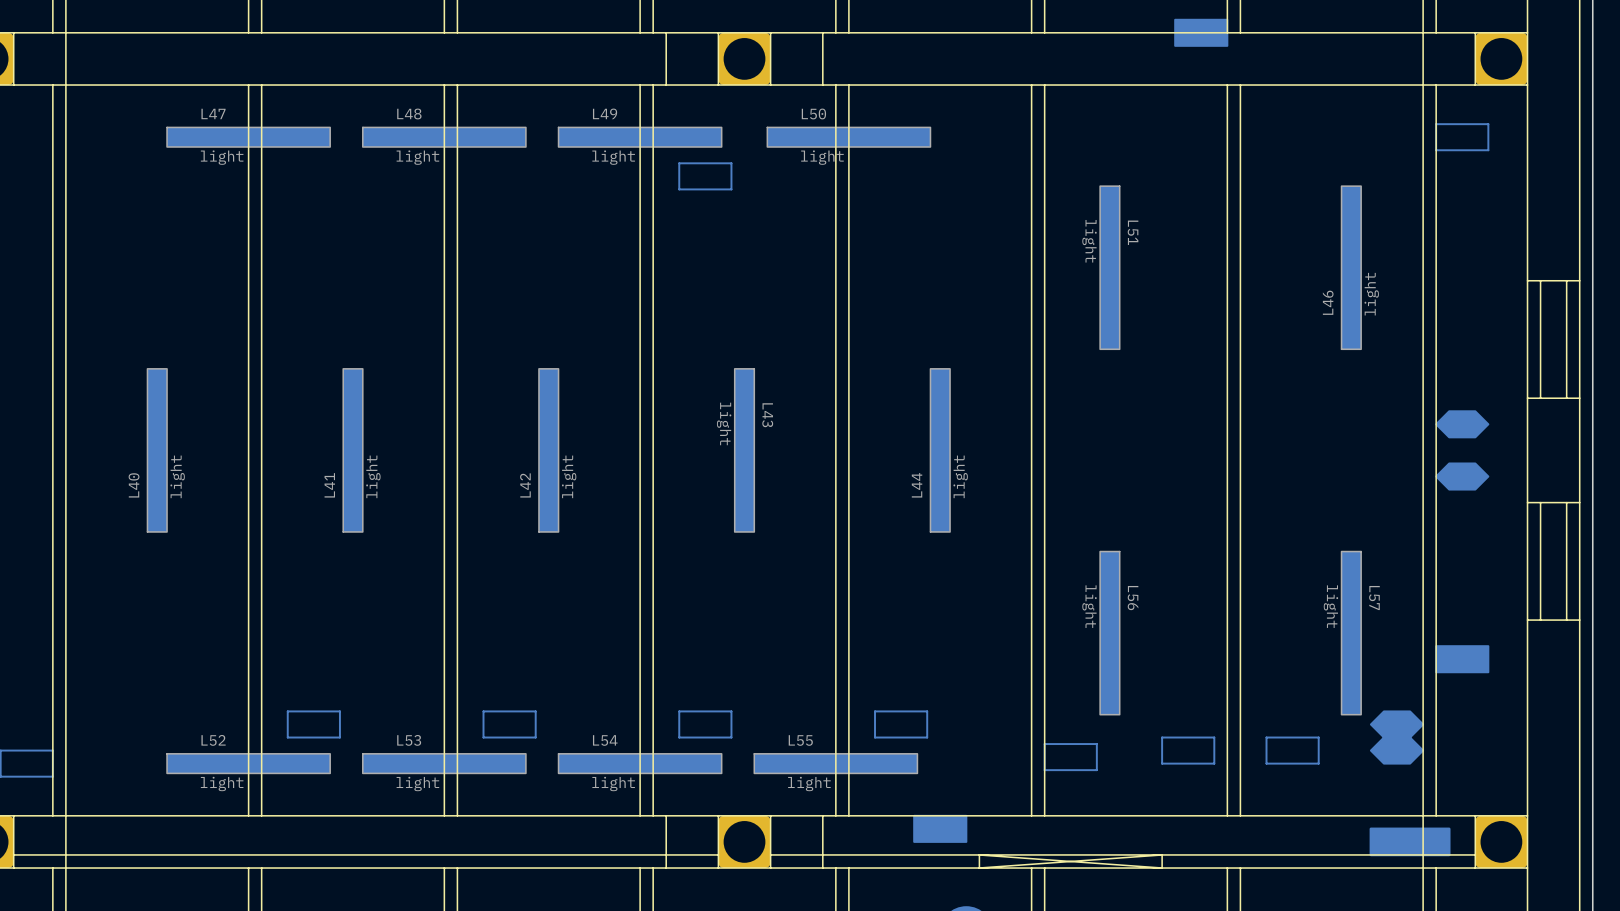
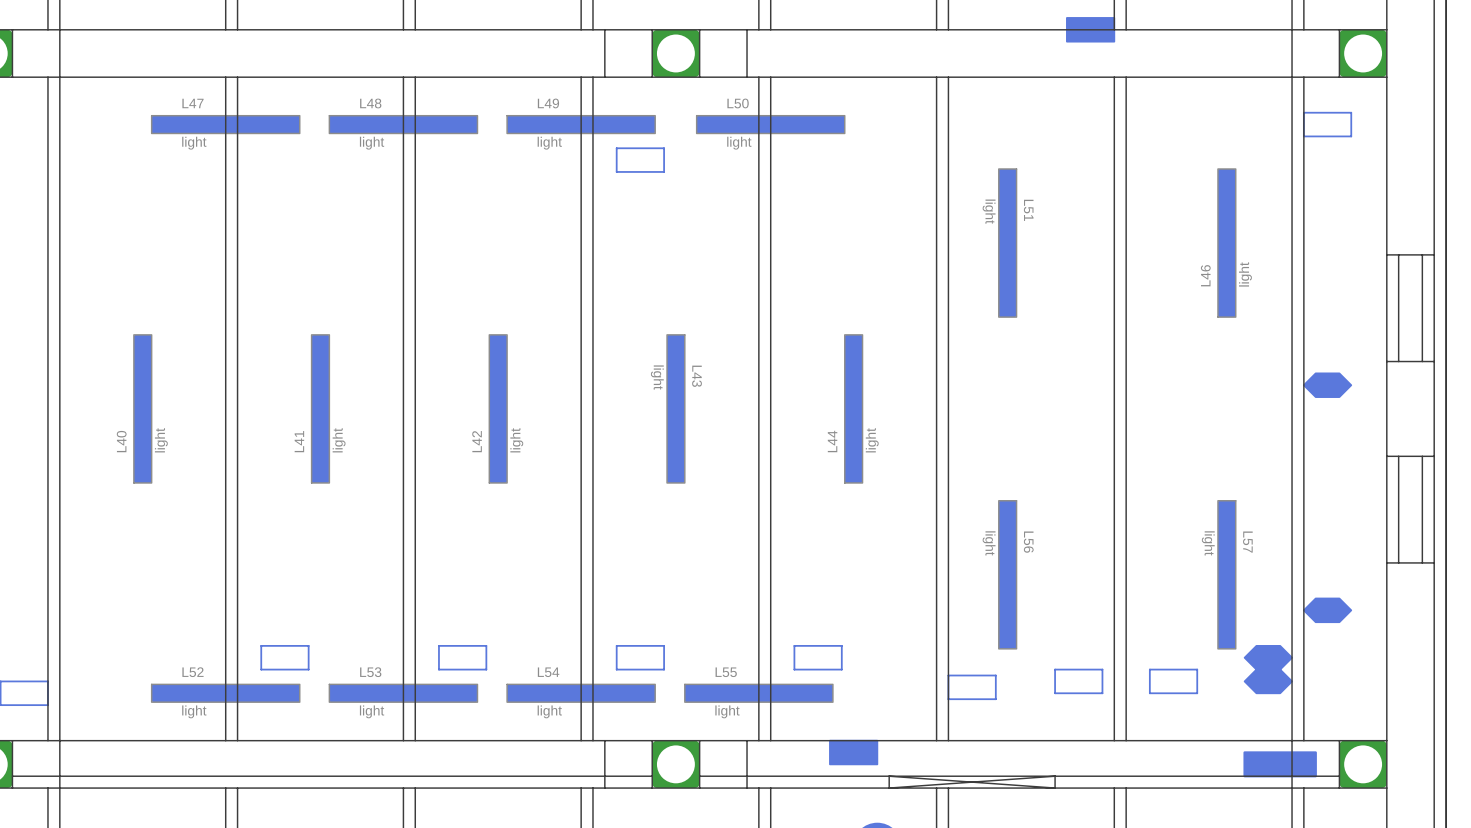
drawing position: (1462, 476) -> (1327, 610)
drawing: [1435, 645, 1490, 674] -> none

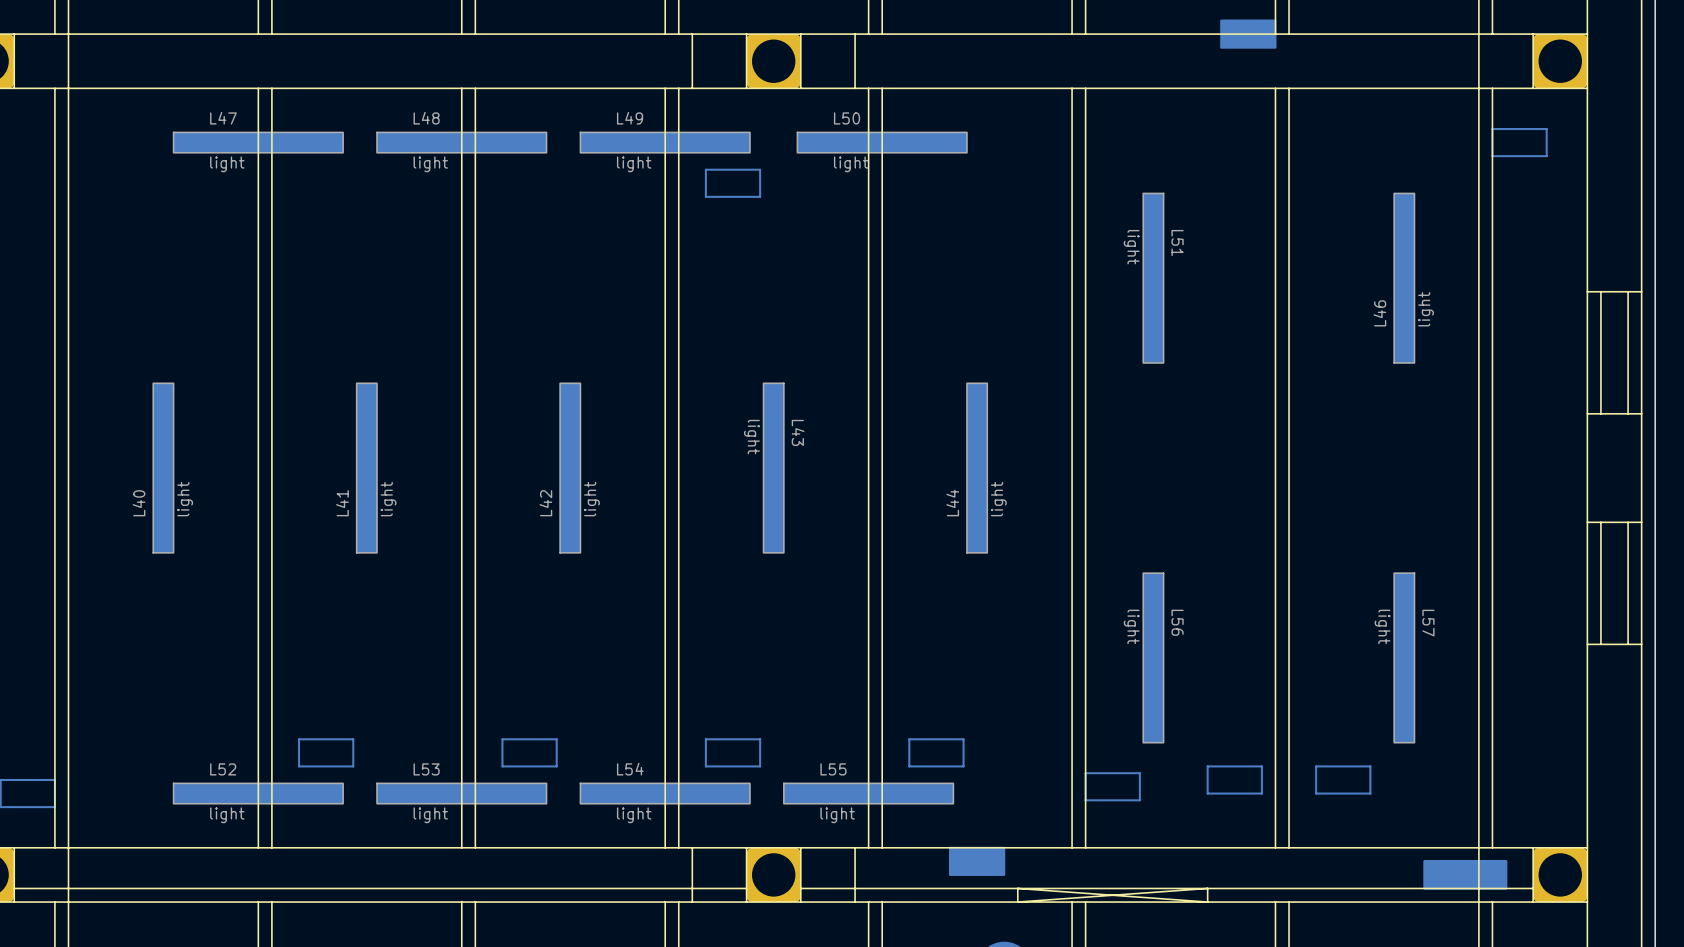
drawing: [1302, 372, 1353, 398] -> none
drawing: [1302, 597, 1353, 624] -> none
drawing: [1243, 644, 1293, 695] -> none

